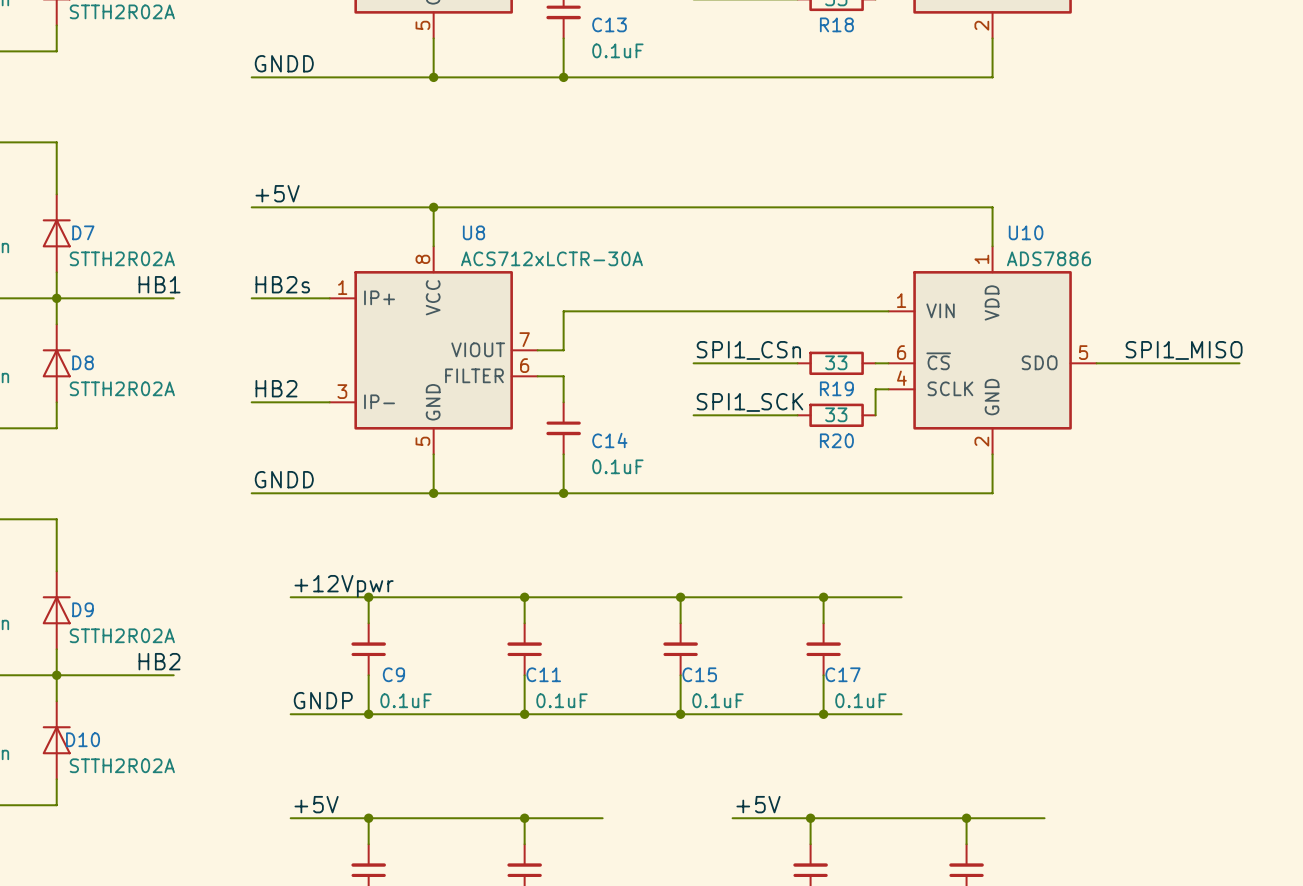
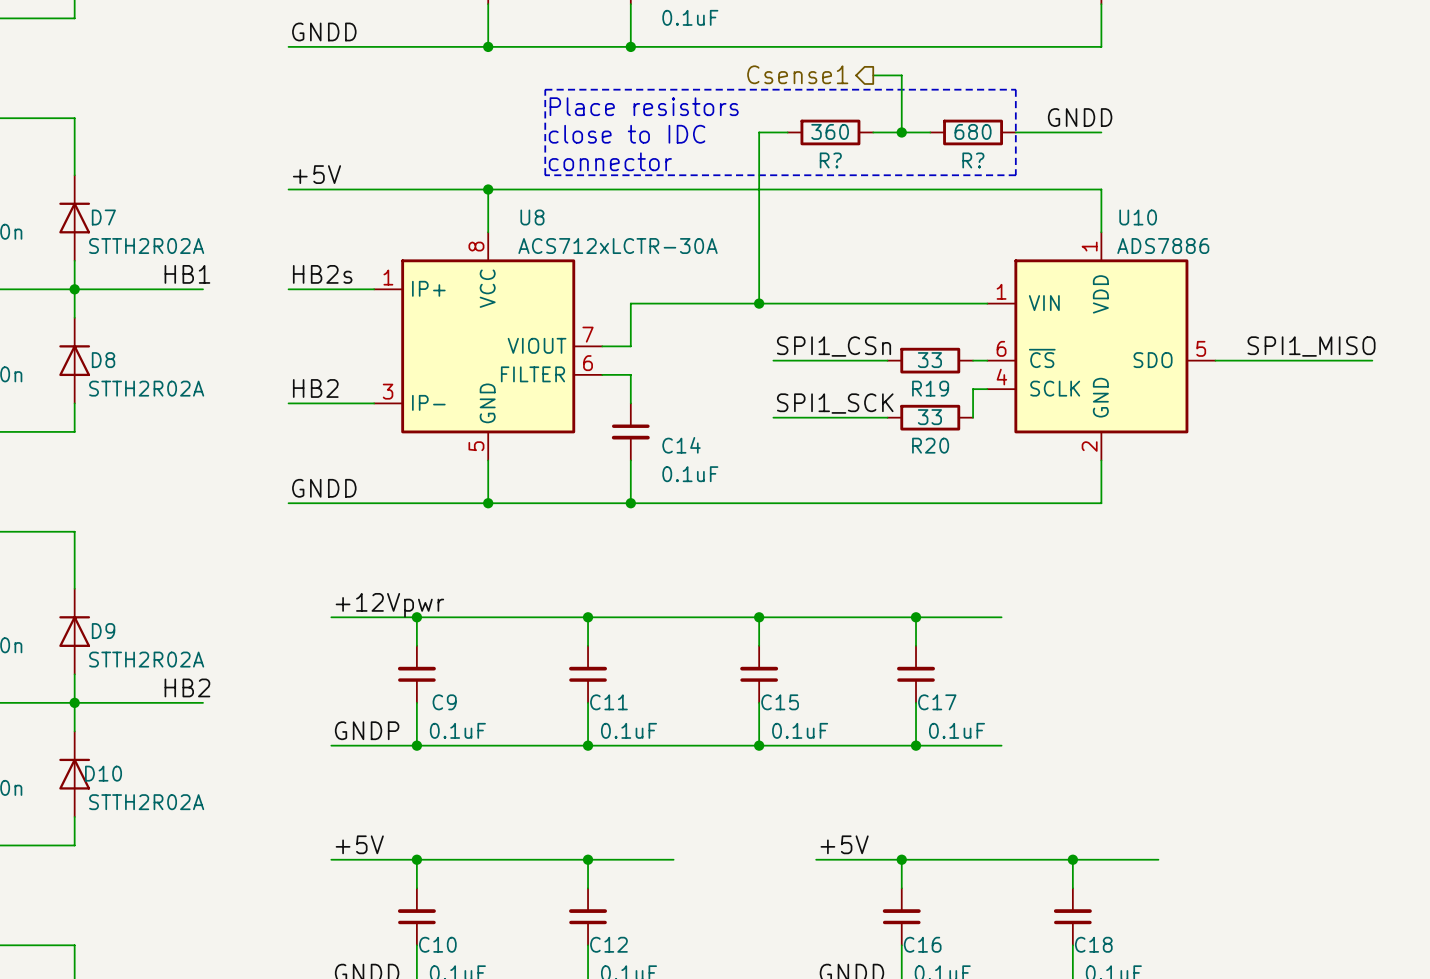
hierarchical label: none -> Csense1 (797, 74)
wire: none -> (873, 75) (901, 75) (901, 132)
line: none -> (545, 89) (1015, 89) (1015, 175) (545, 175) (545, 89)
text: none -> Place resistors (644, 106)
label: none -> GNDD (1080, 117)
wire: none -> (787, 132) (759, 132) (759, 303)
R?: none -> 360 (830, 132)
wire: none -> (873, 132) (930, 132)
junction: none -> (901, 132)
R?: none -> 680 (973, 132)
wire: none -> (1015, 132) (1101, 132)
text: none -> close to IDC (627, 134)
text: none -> connector (610, 161)
junction: none -> (759, 303)

